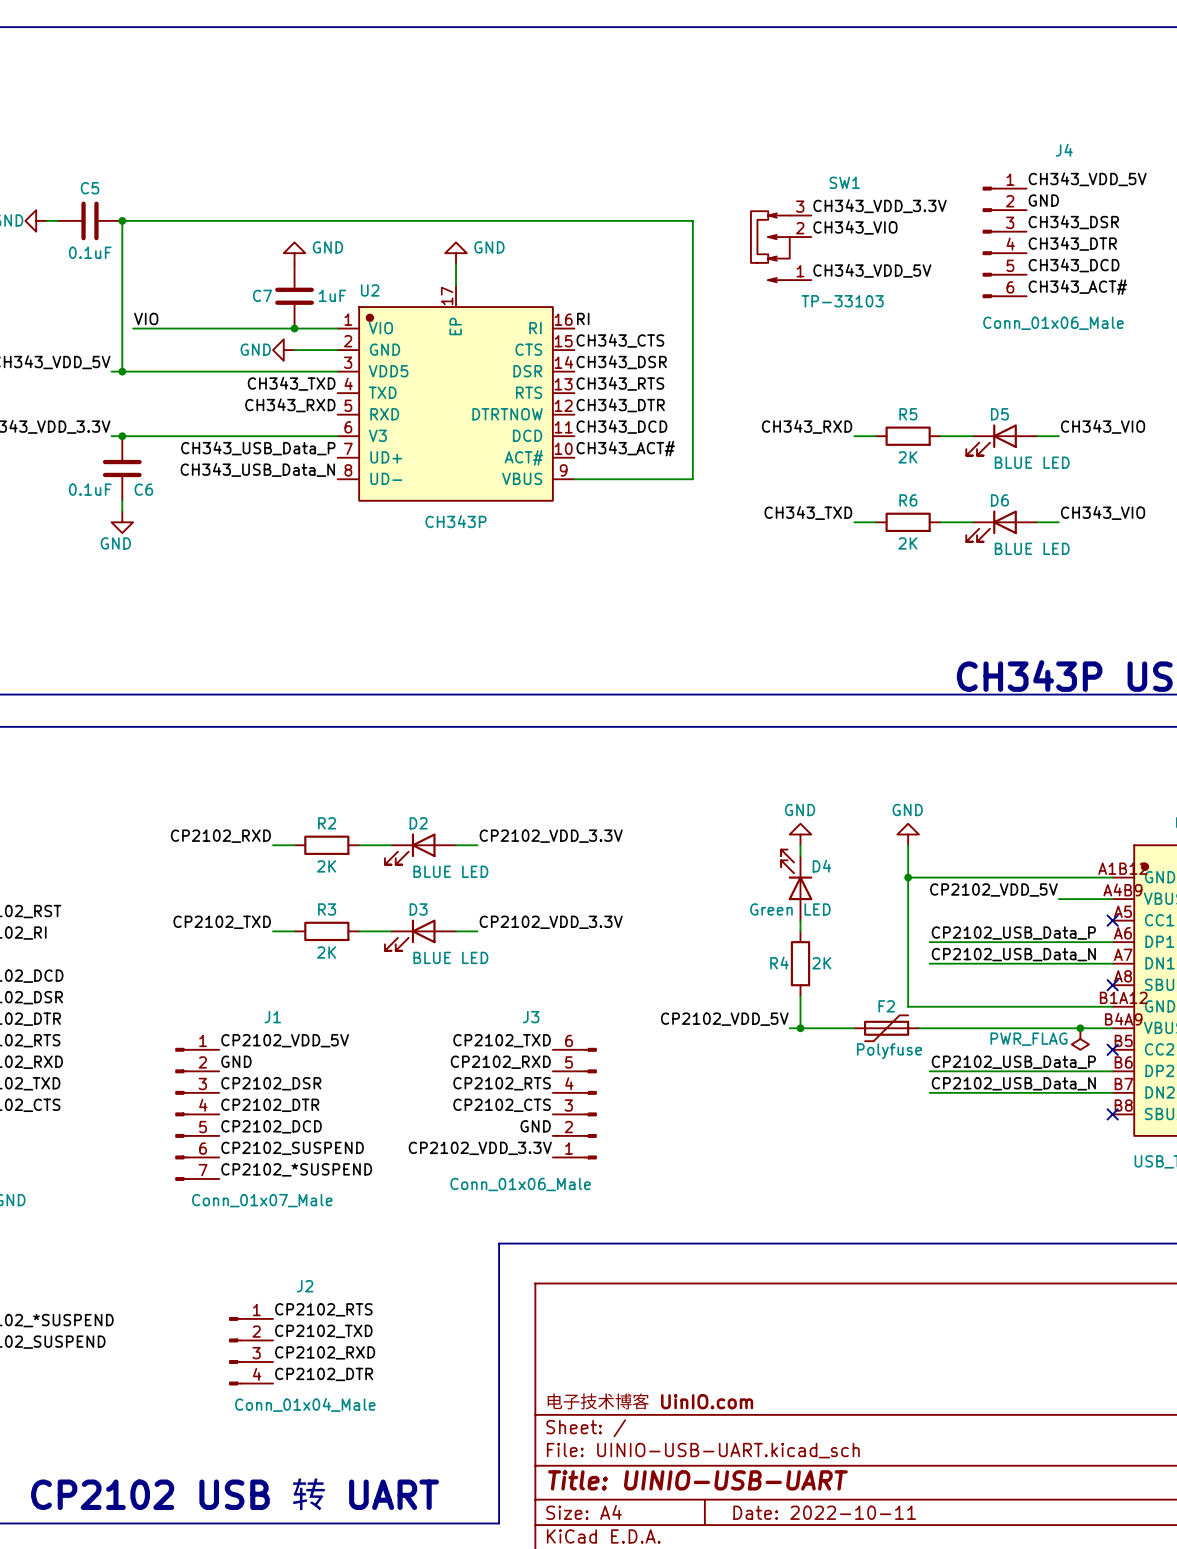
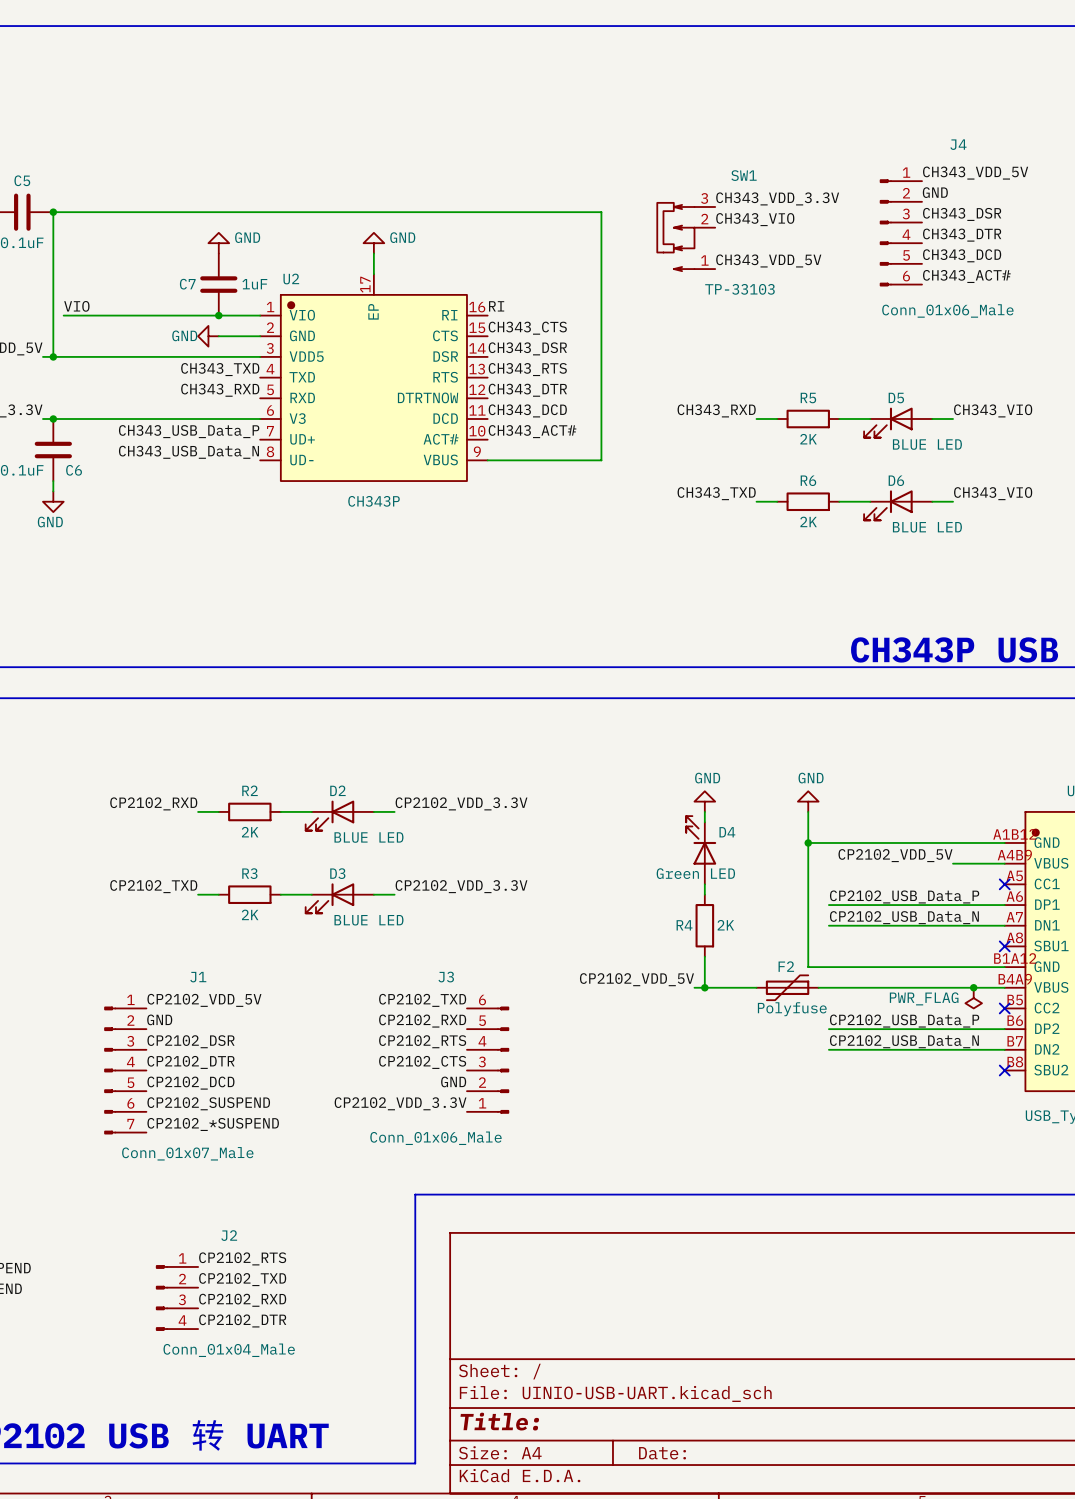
title block: 电子技术博客 UinIO.com (649, 1401) -> none
title block: Title: UINIO-USB-UART (697, 1480) -> Title: (499, 1421)
title block: Date: 2022-10-11 (824, 1512) -> Date: (662, 1453)

